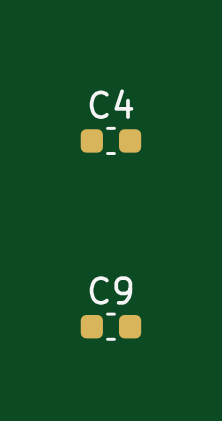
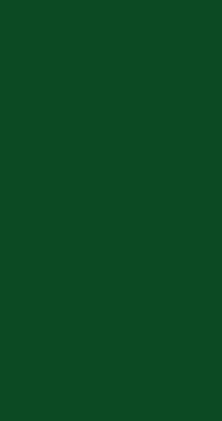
C4: (110, 140) -> none
C9: (110, 326) -> none

